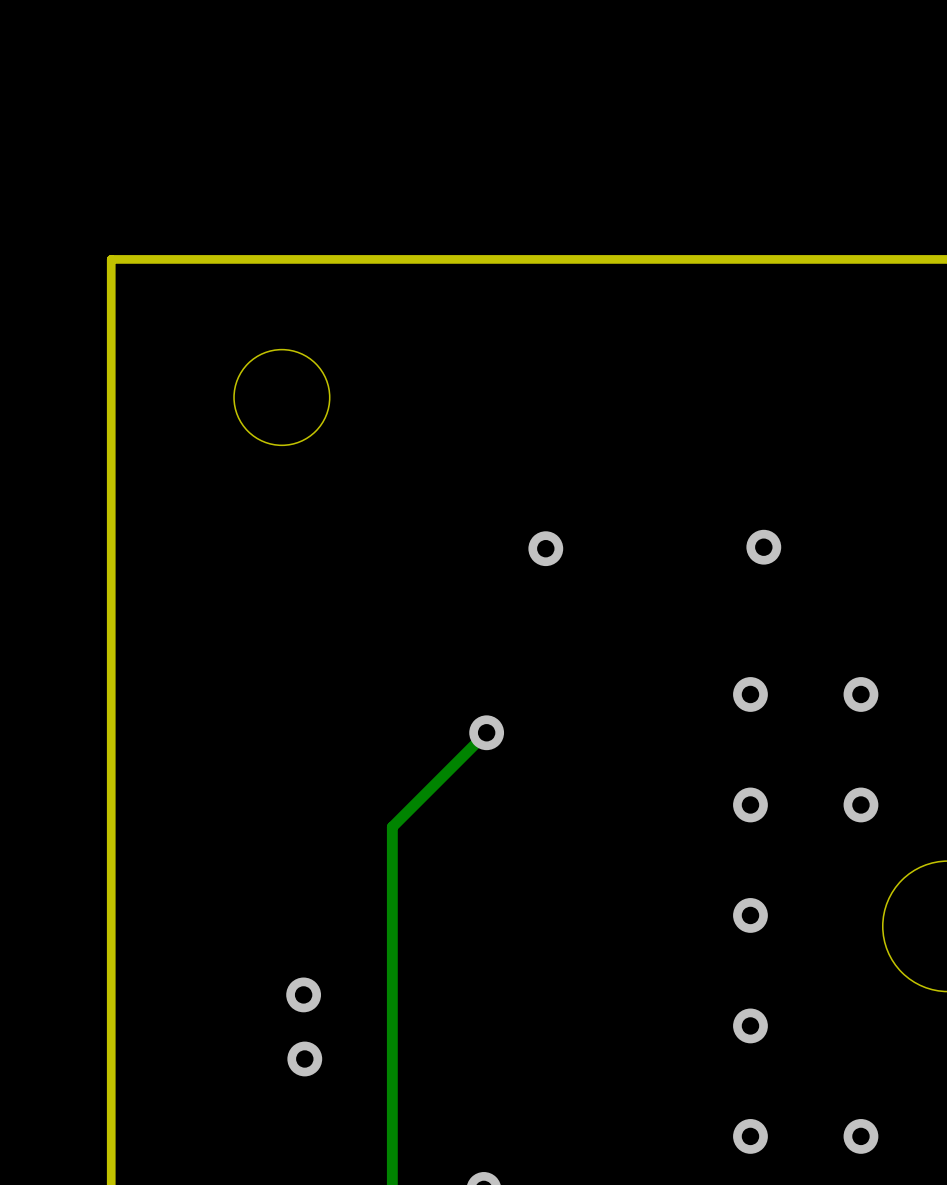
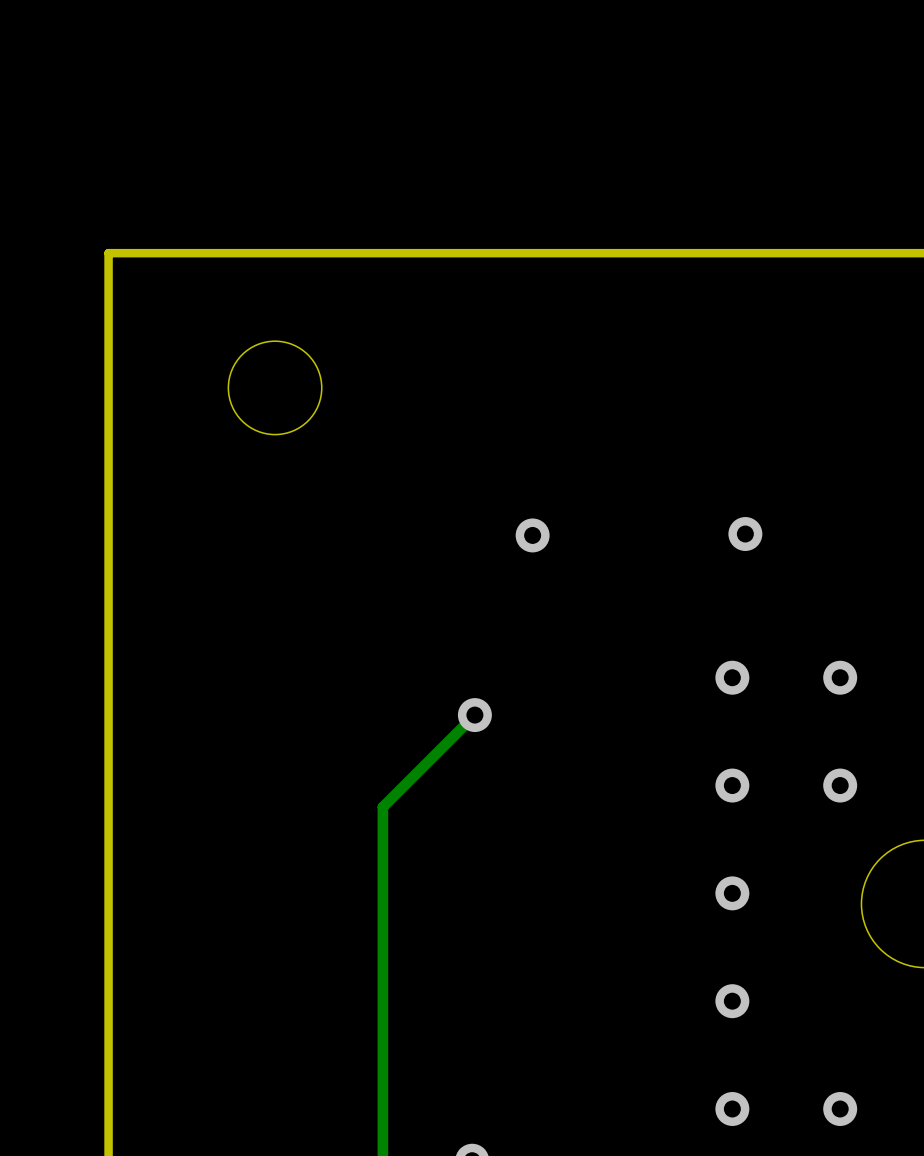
via: (303, 994) -> none
via: (304, 1058) -> none

